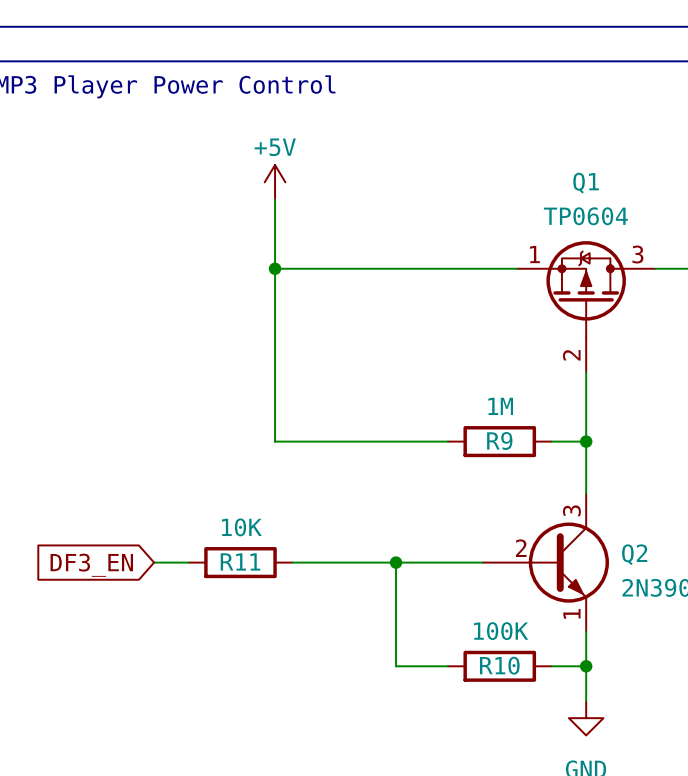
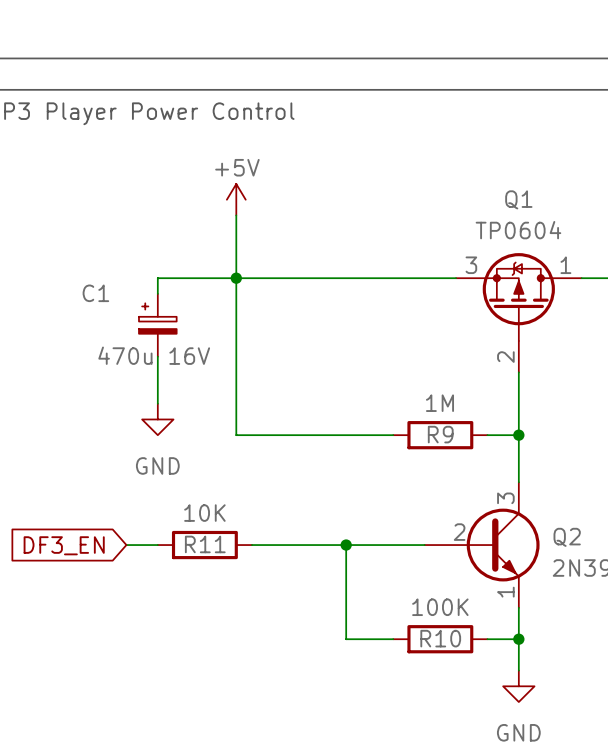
Q1 pin number: 1 (534, 254) -> 3 (471, 265)
Q1 pin number: 3 (637, 254) -> 1 (565, 265)
wire: none -> (236, 278) (157, 278) (157, 293)
C1: none -> 470u 16V (157, 325)
wire: none -> (157, 356) (157, 403)
power symbol: none -> GND (157, 419)

